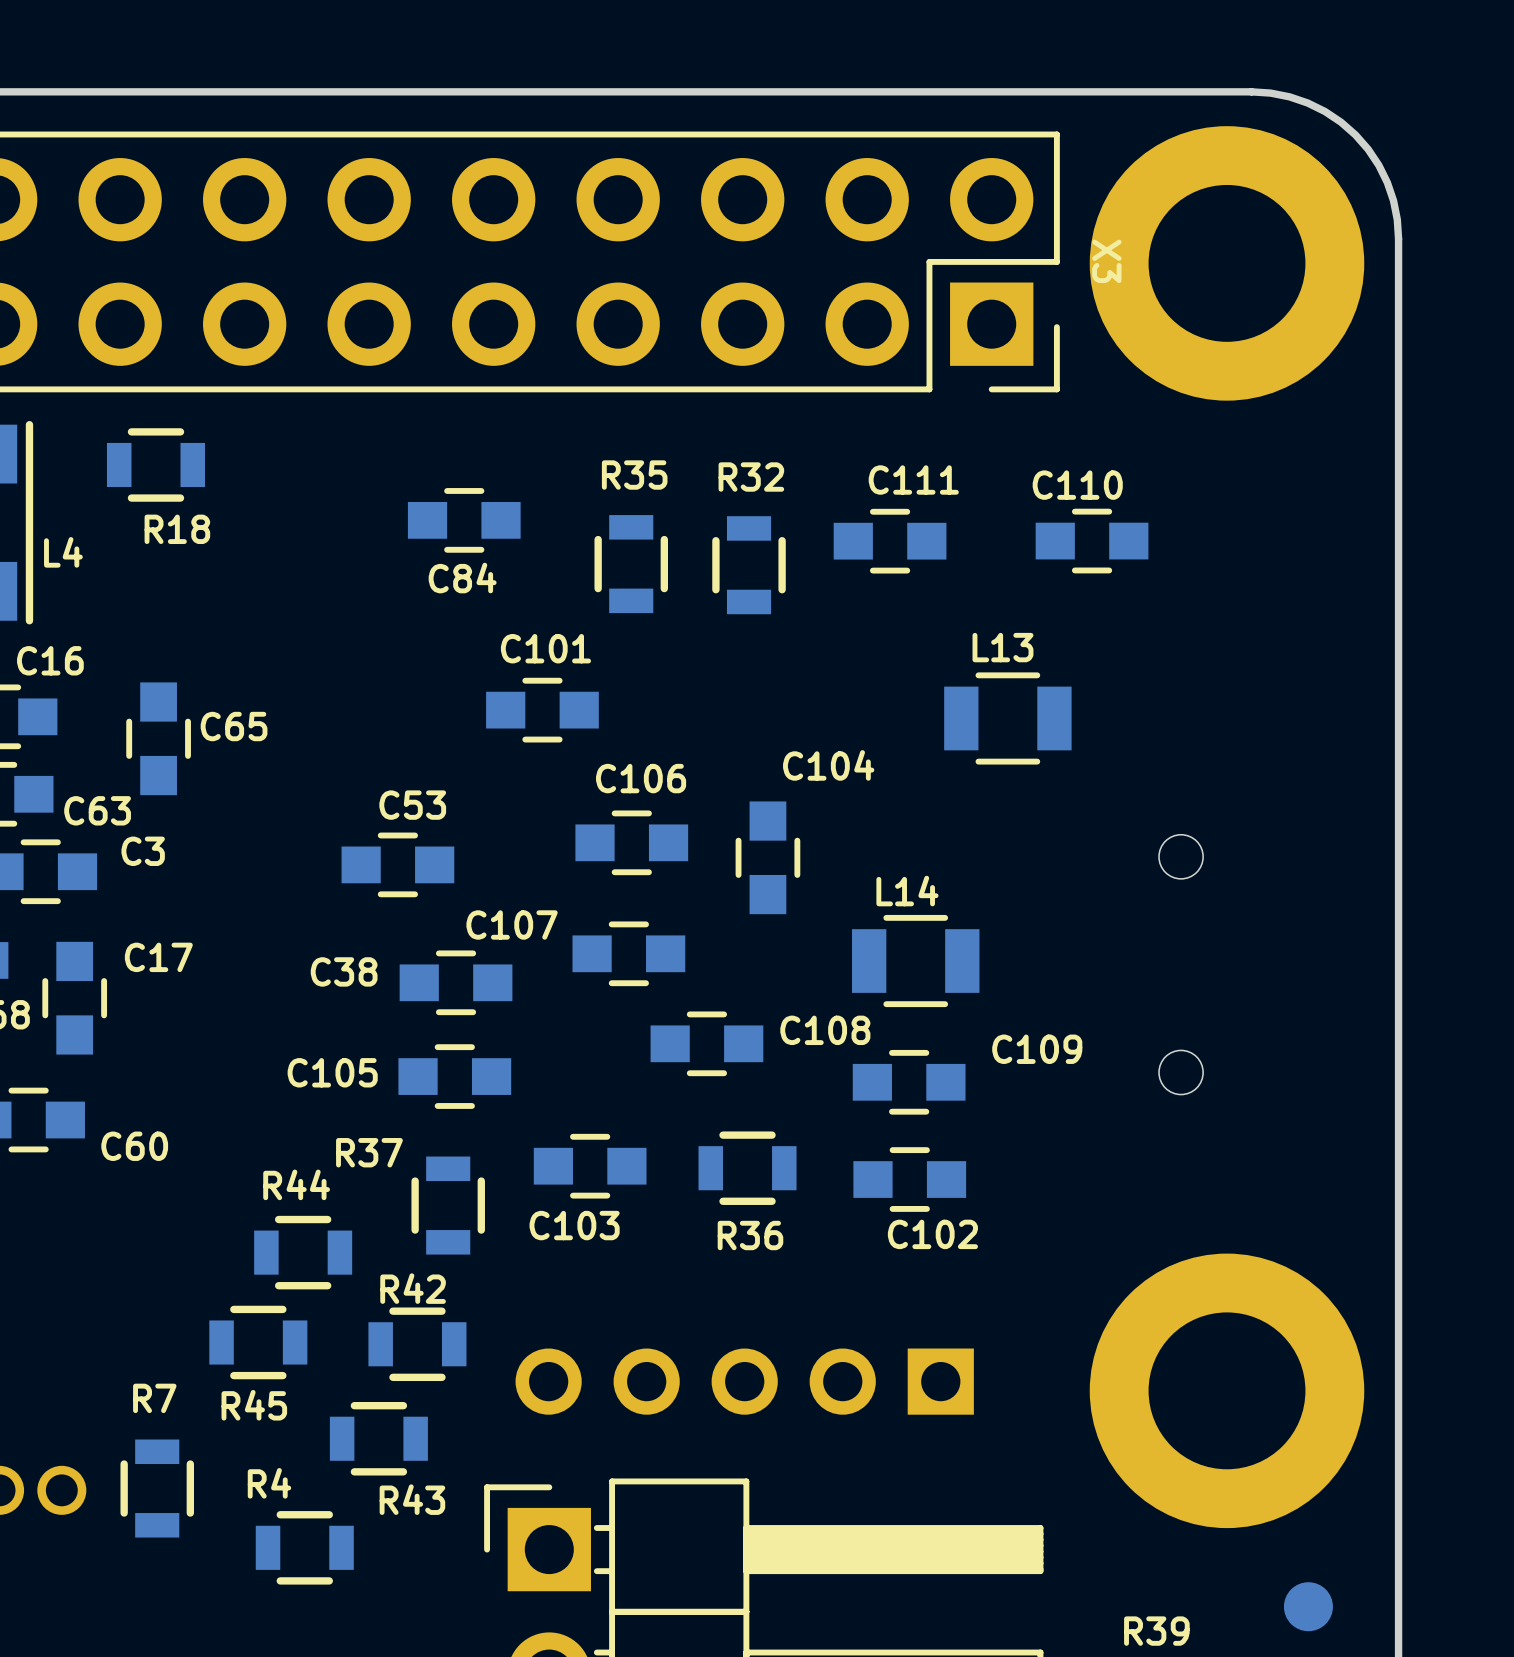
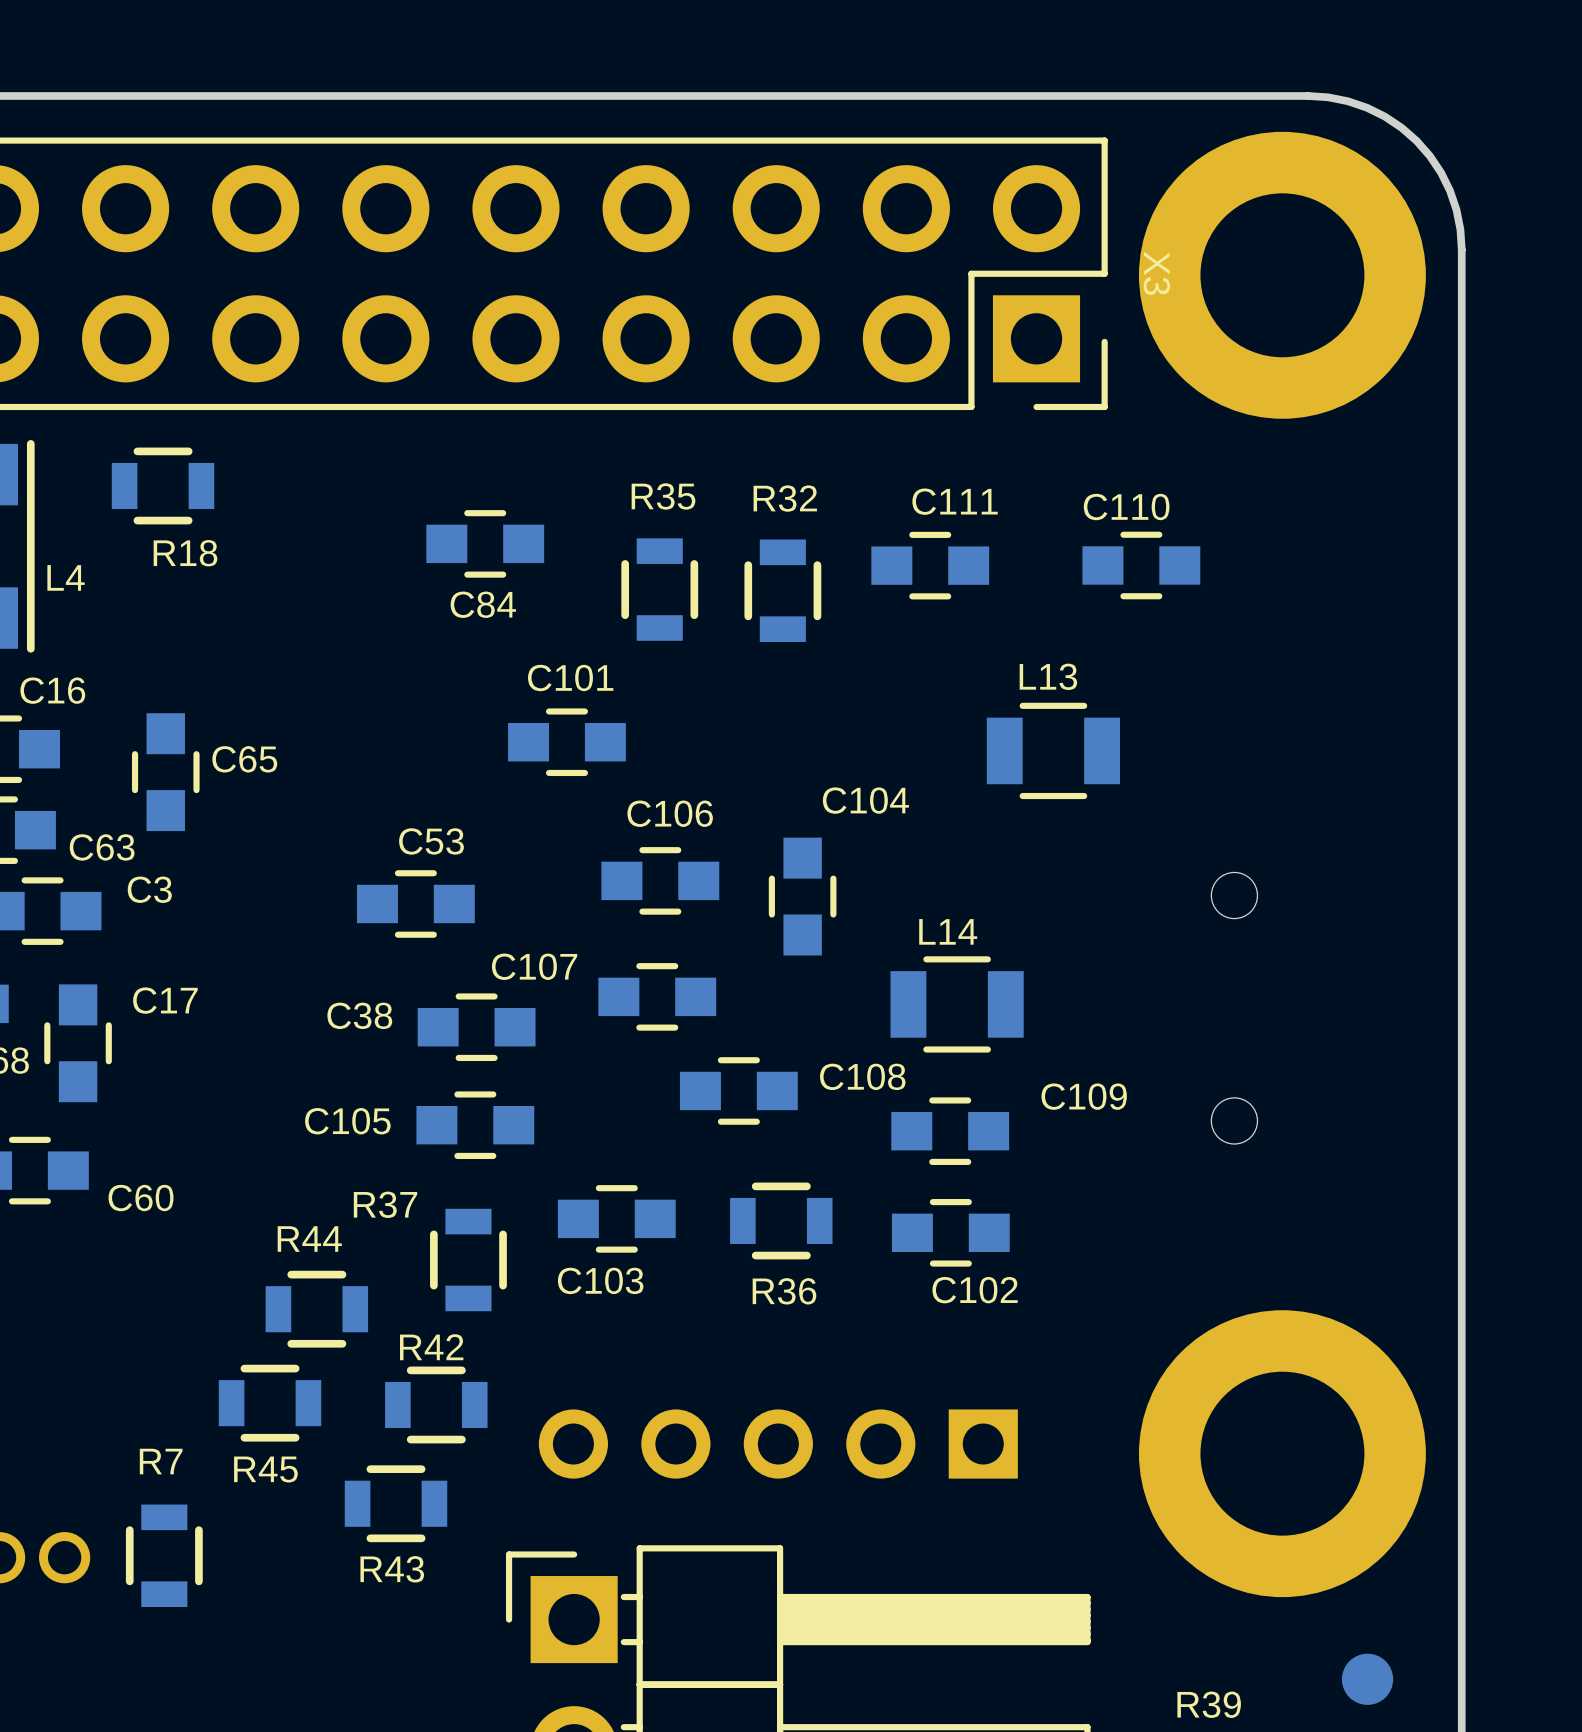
R43 name position: R43 (412, 1499) -> R43 (392, 1569)
R4: (304, 1547) -> none

